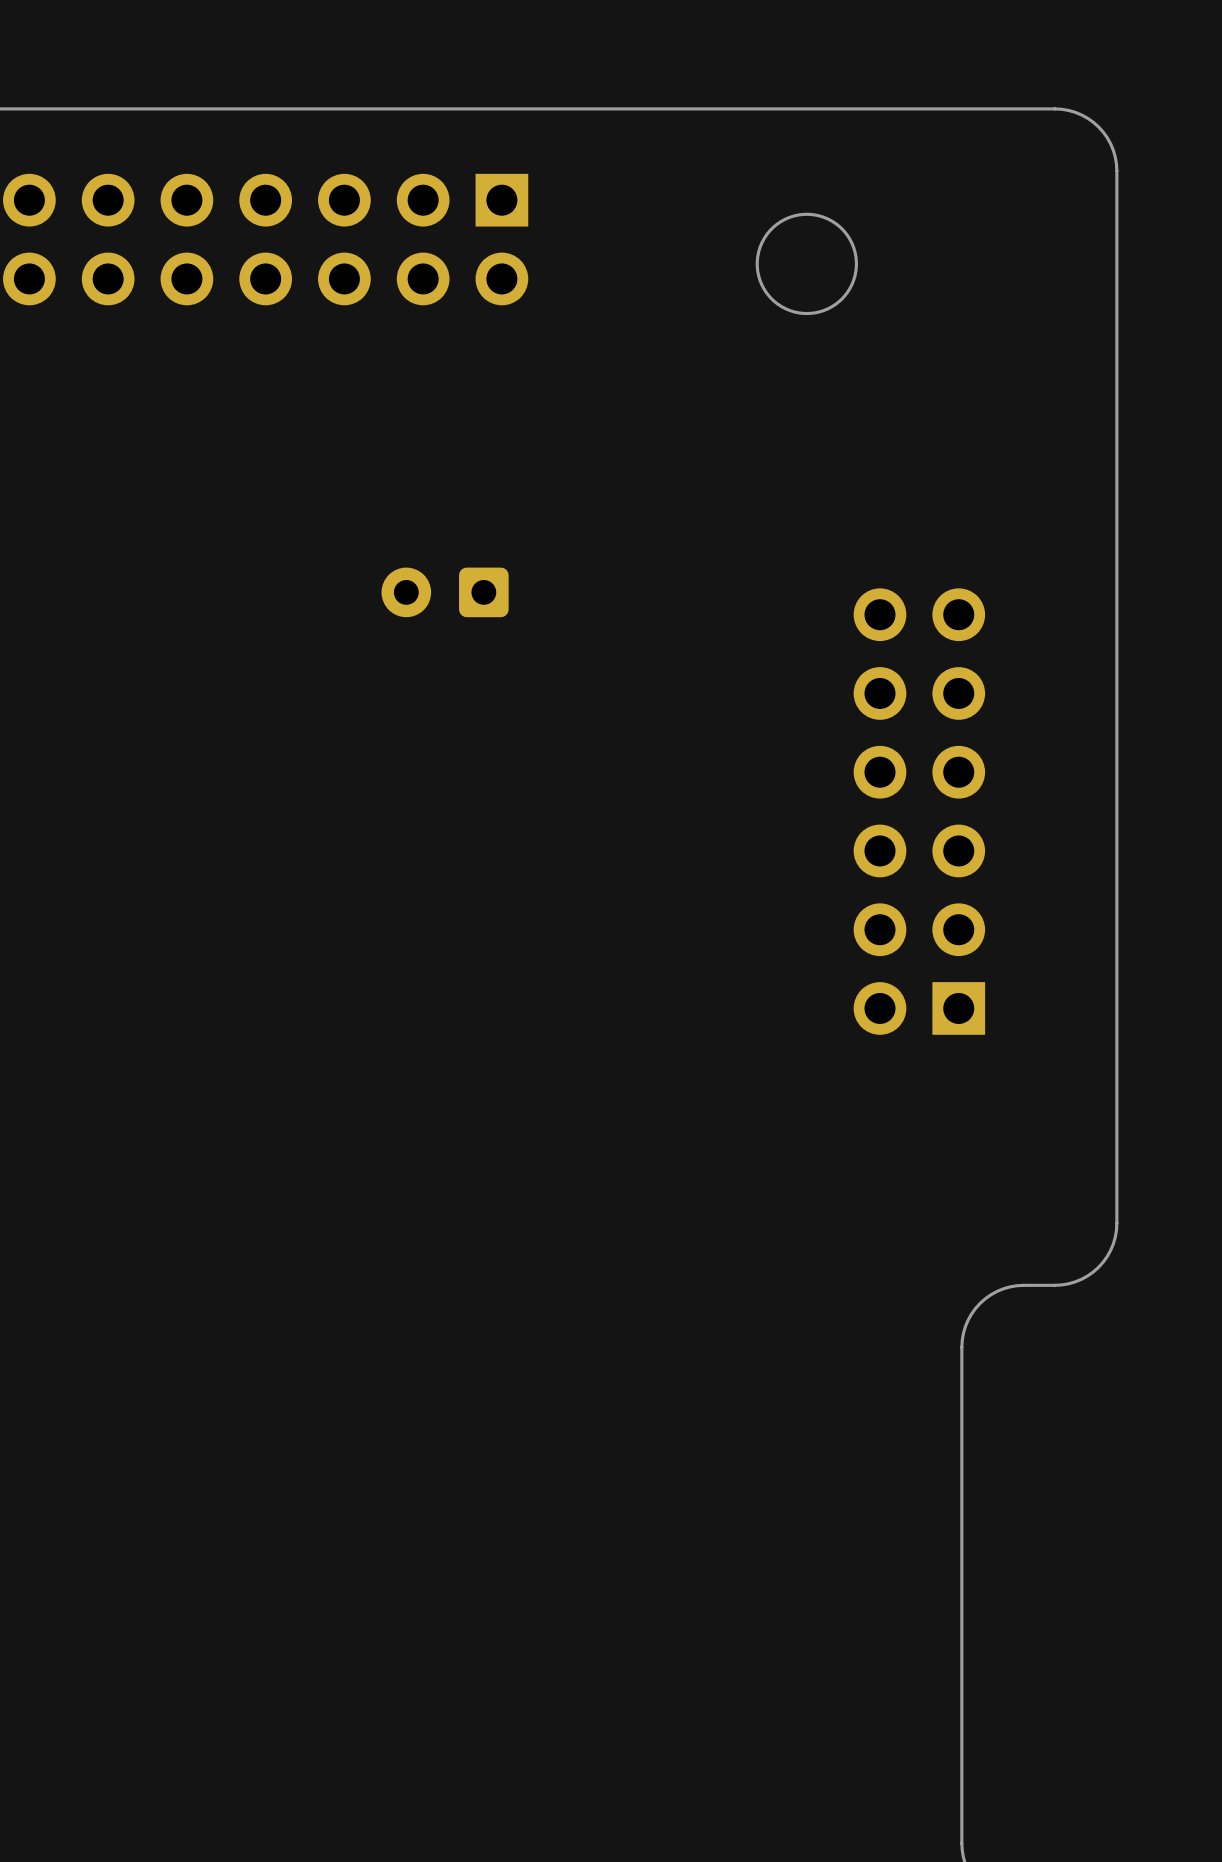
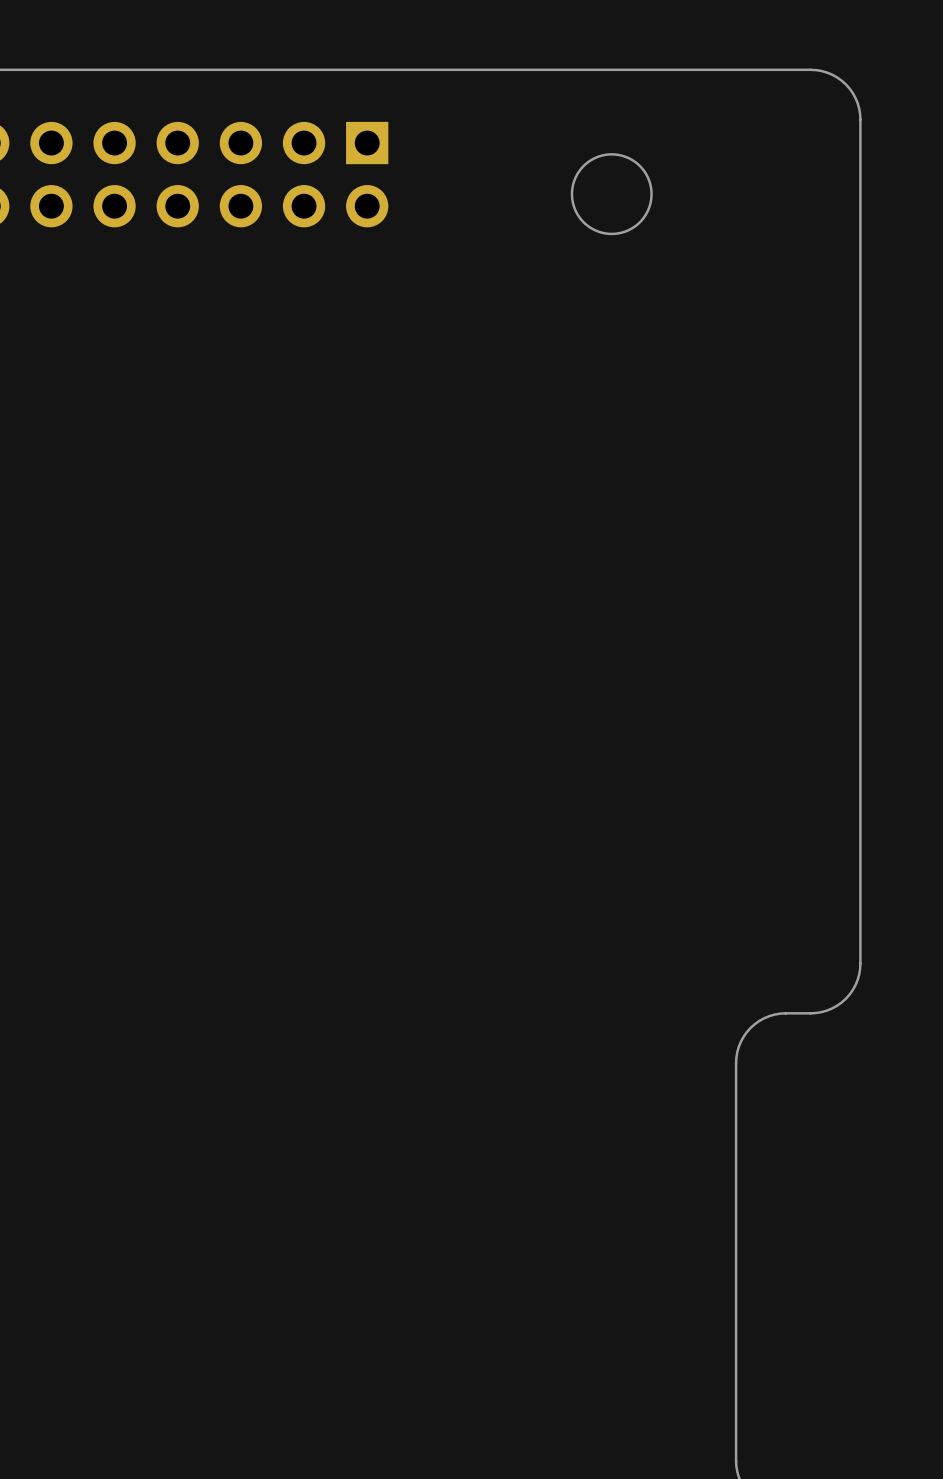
part: (445, 592) -> none
part: (919, 811) -> none

